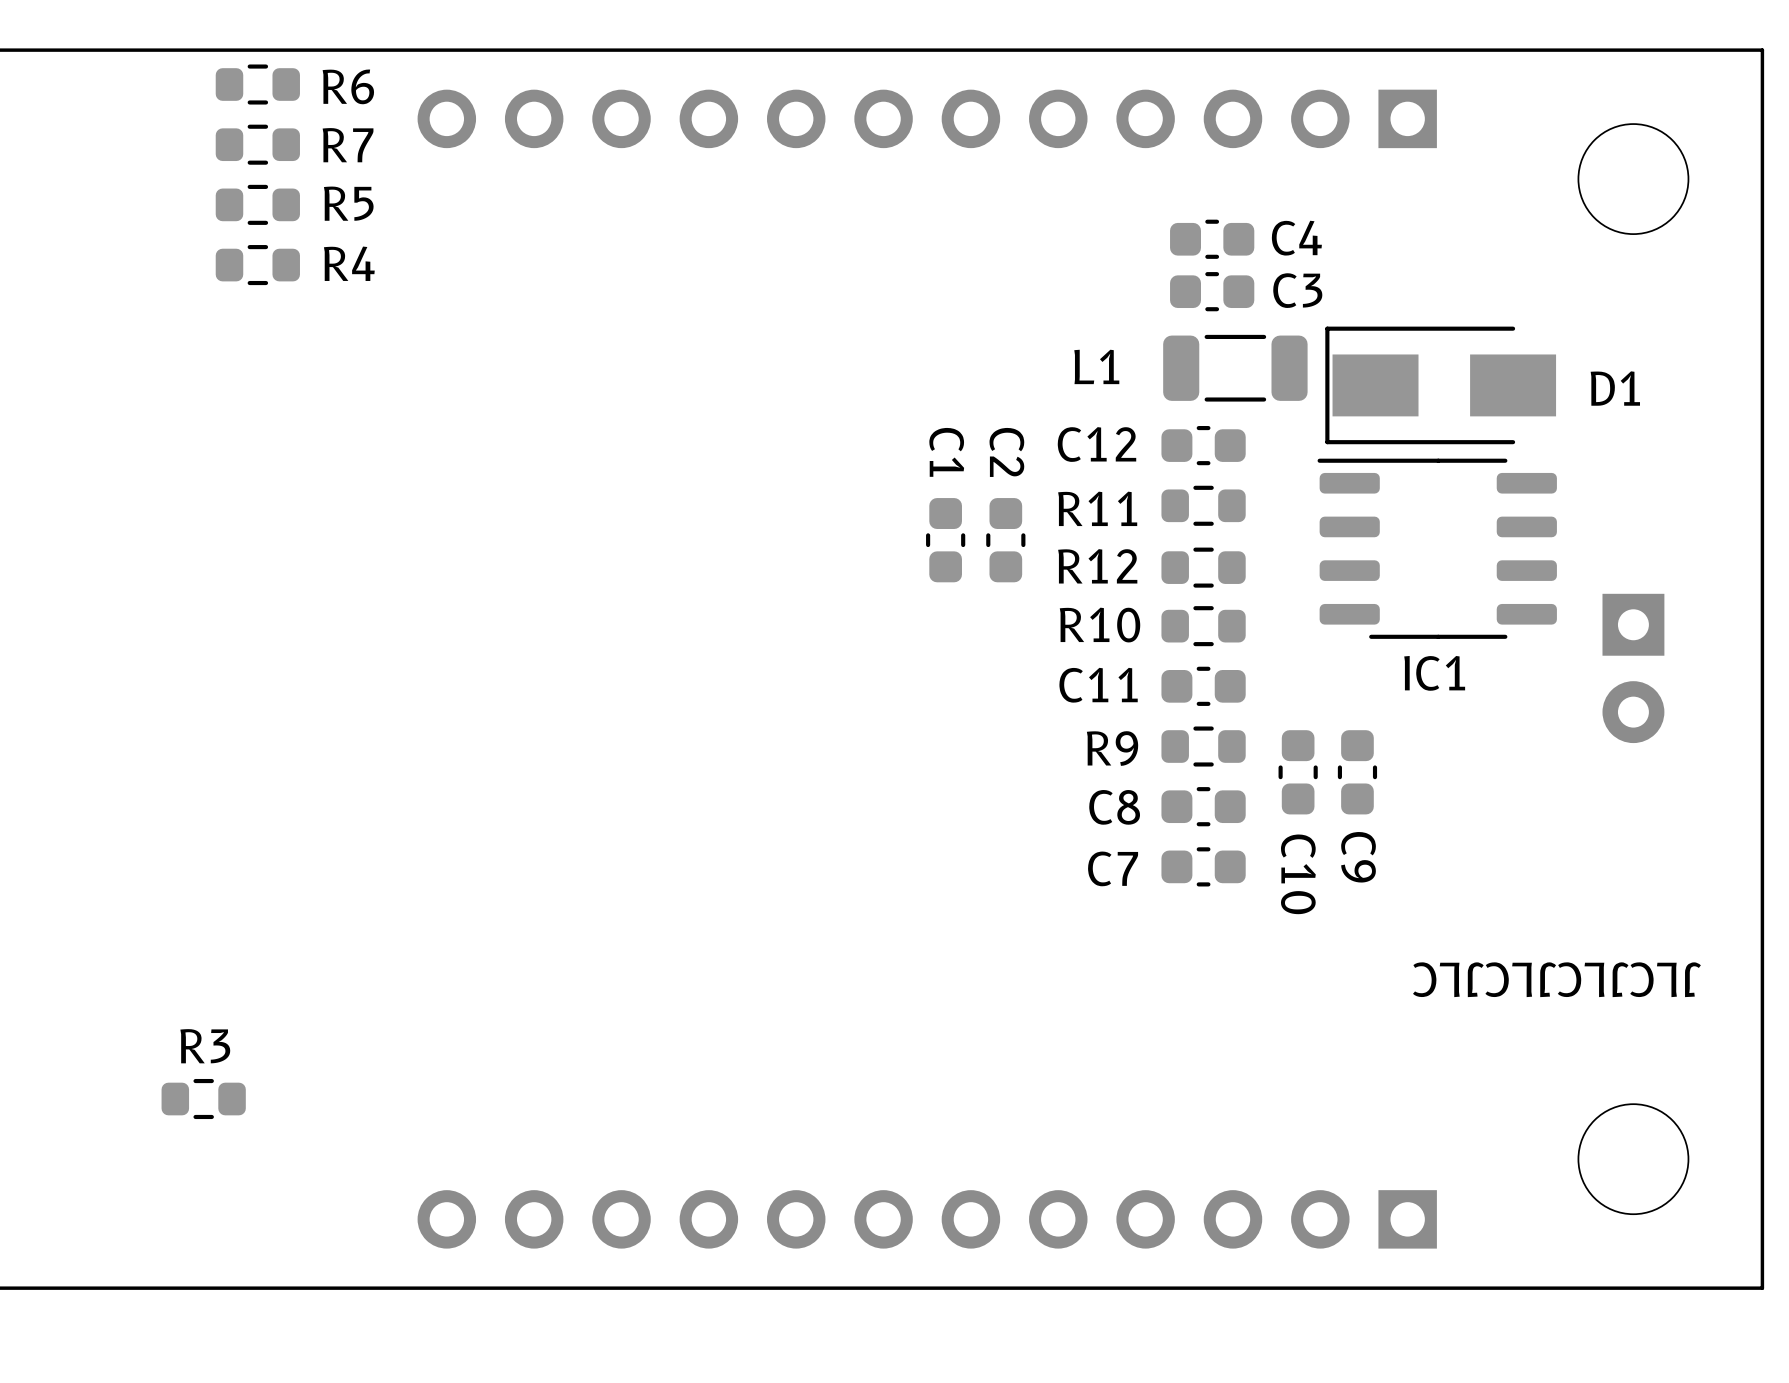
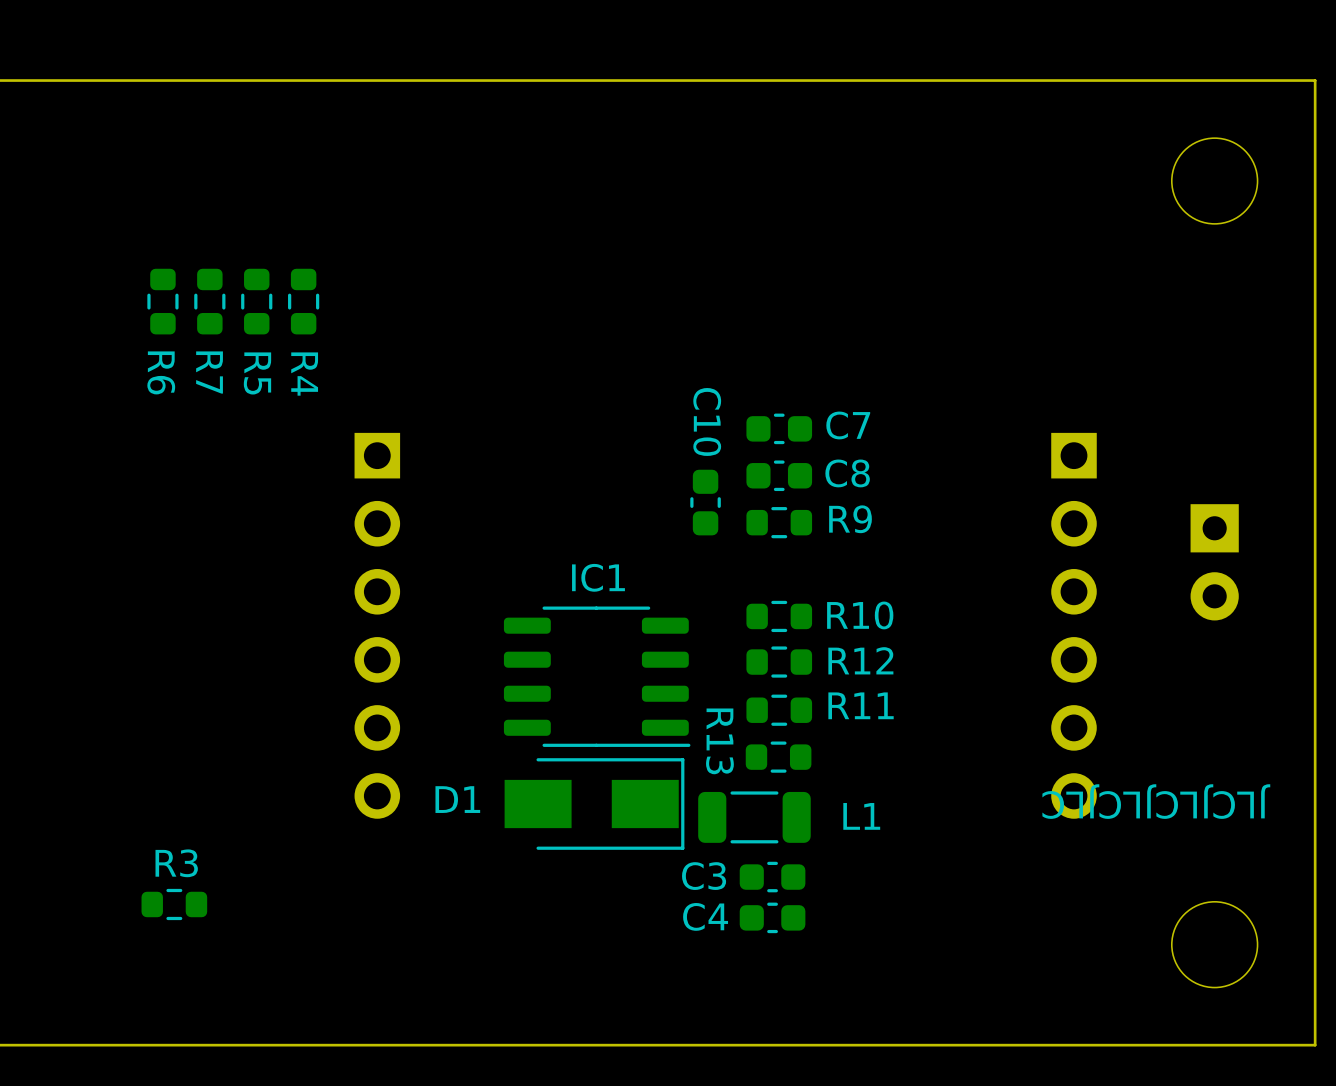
R6 rotation: 0° (257, 84) -> 90° clockwise (162, 301)
R6 position: (257, 84) -> (162, 301)
part: (927, 118) -> none
R7 rotation: 0° (257, 144) -> 90° clockwise (209, 301)
R7 position: (257, 144) -> (209, 301)
R5 rotation: 0° (257, 204) -> 90° clockwise (256, 301)
R5 position: (257, 204) -> (256, 301)
C4 name position: C4 (1296, 238) -> C4 (705, 916)
C4 position: (1212, 239) -> (772, 917)
R4 rotation: 0° (257, 265) -> 90° clockwise (303, 301)
R4 position: (257, 265) -> (303, 301)
C3 name position: C3 (1297, 290) -> C3 (704, 876)
C3 position: (1212, 291) -> (772, 877)
L1 name position: L1 (1096, 366) -> L1 (861, 816)
L1 position: (1235, 368) -> (754, 817)
D1 rotation: 0° (1440, 385) -> 180° (594, 804)
D1 position: (1440, 385) -> (594, 804)
C12: (1203, 445) -> none
R11 position: (1203, 505) -> (779, 710)
R11 name position: R11 (1097, 508) -> R11 (861, 705)
C1: (945, 540) -> none
C2: (1005, 540) -> none
IC1 rotation: 0° (1437, 548) -> 180° (597, 676)
IC1 position: (1437, 548) -> (597, 676)
R12 name position: R12 (1097, 566) -> R12 (860, 660)
R12 position: (1203, 567) -> (779, 662)
R10 name position: R10 (1100, 625) -> R10 (860, 615)
R10 position: (1203, 626) -> (779, 616)
C11: (1203, 686) -> none
R9 position: (1203, 746) -> (779, 522)
R9 name position: R9 (1112, 748) -> R9 (850, 519)
part: none -> (377, 625)
part: none -> (1074, 625)
C10 position: (1298, 772) -> (705, 502)
C9: (1357, 772) -> none
C8 position: (1203, 806) -> (779, 475)
C8 name position: C8 (1114, 807) -> C8 (847, 473)
C7 position: (1203, 866) -> (779, 428)
C7 name position: C7 (1113, 868) -> C7 (848, 425)
C10 name position: C10 (1298, 874) -> C10 (707, 421)
R13: none -> (778, 757)
R3 position: (203, 1099) -> (174, 904)
part: (927, 1219) -> none

